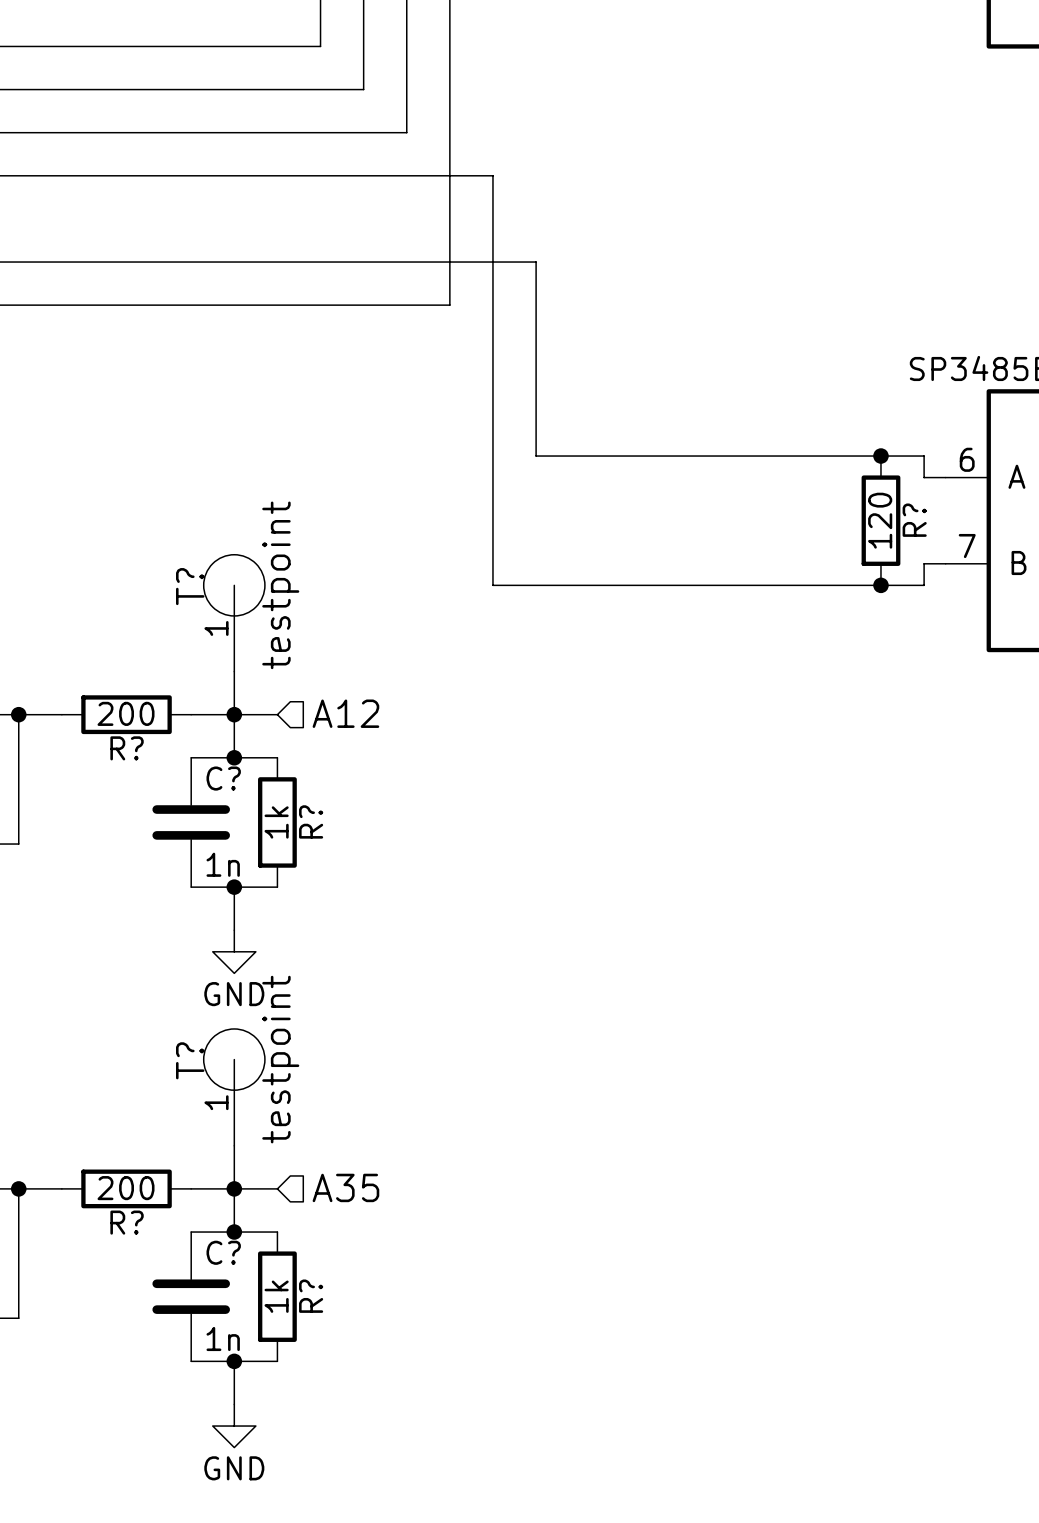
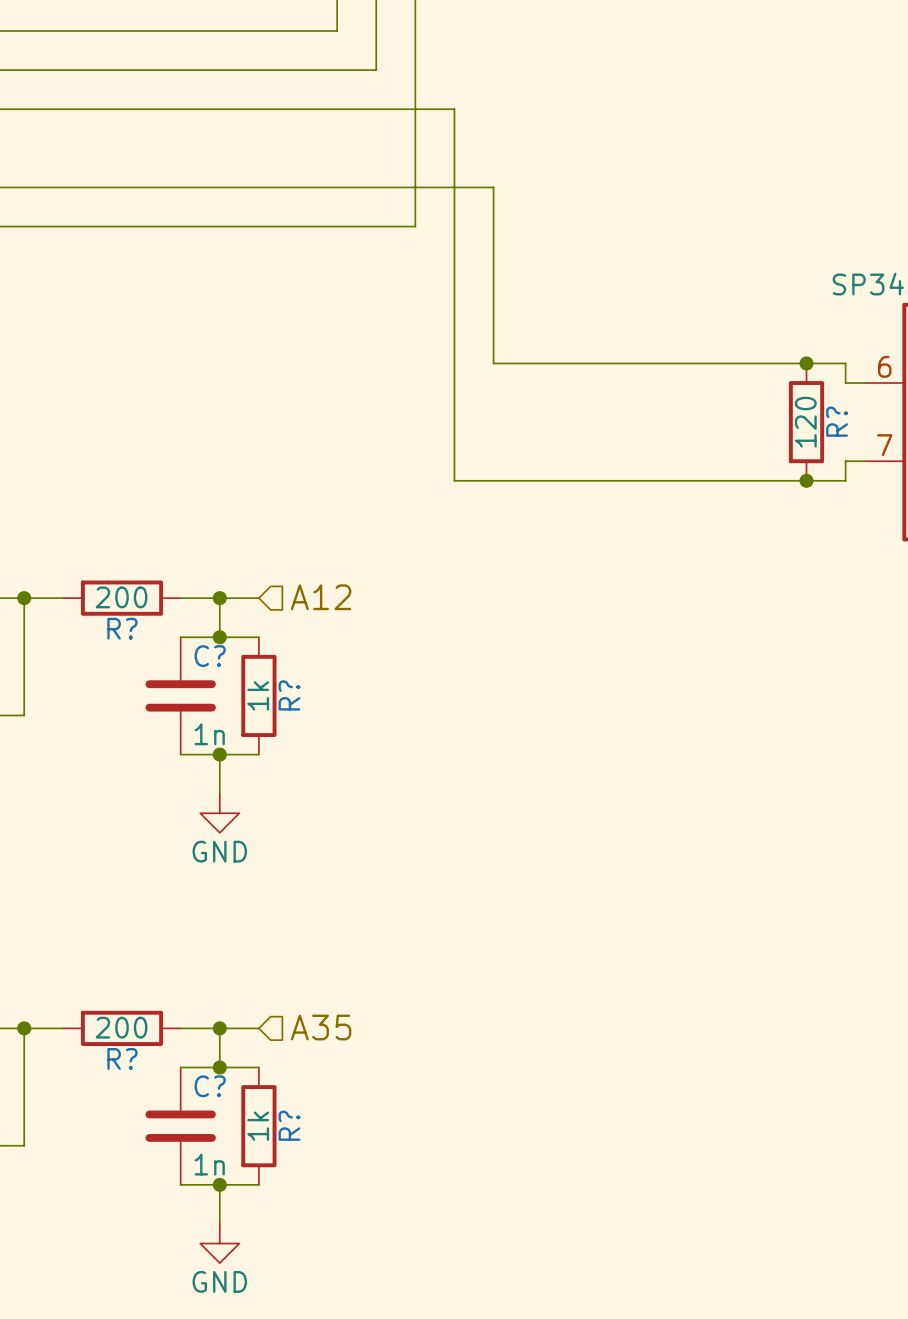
T?: testpoint (234, 613) -> none
wire: (234, 671) (234, 714) -> none
T?: testpoint (234, 1087) -> none
wire: (234, 1145) (234, 1188) -> none

